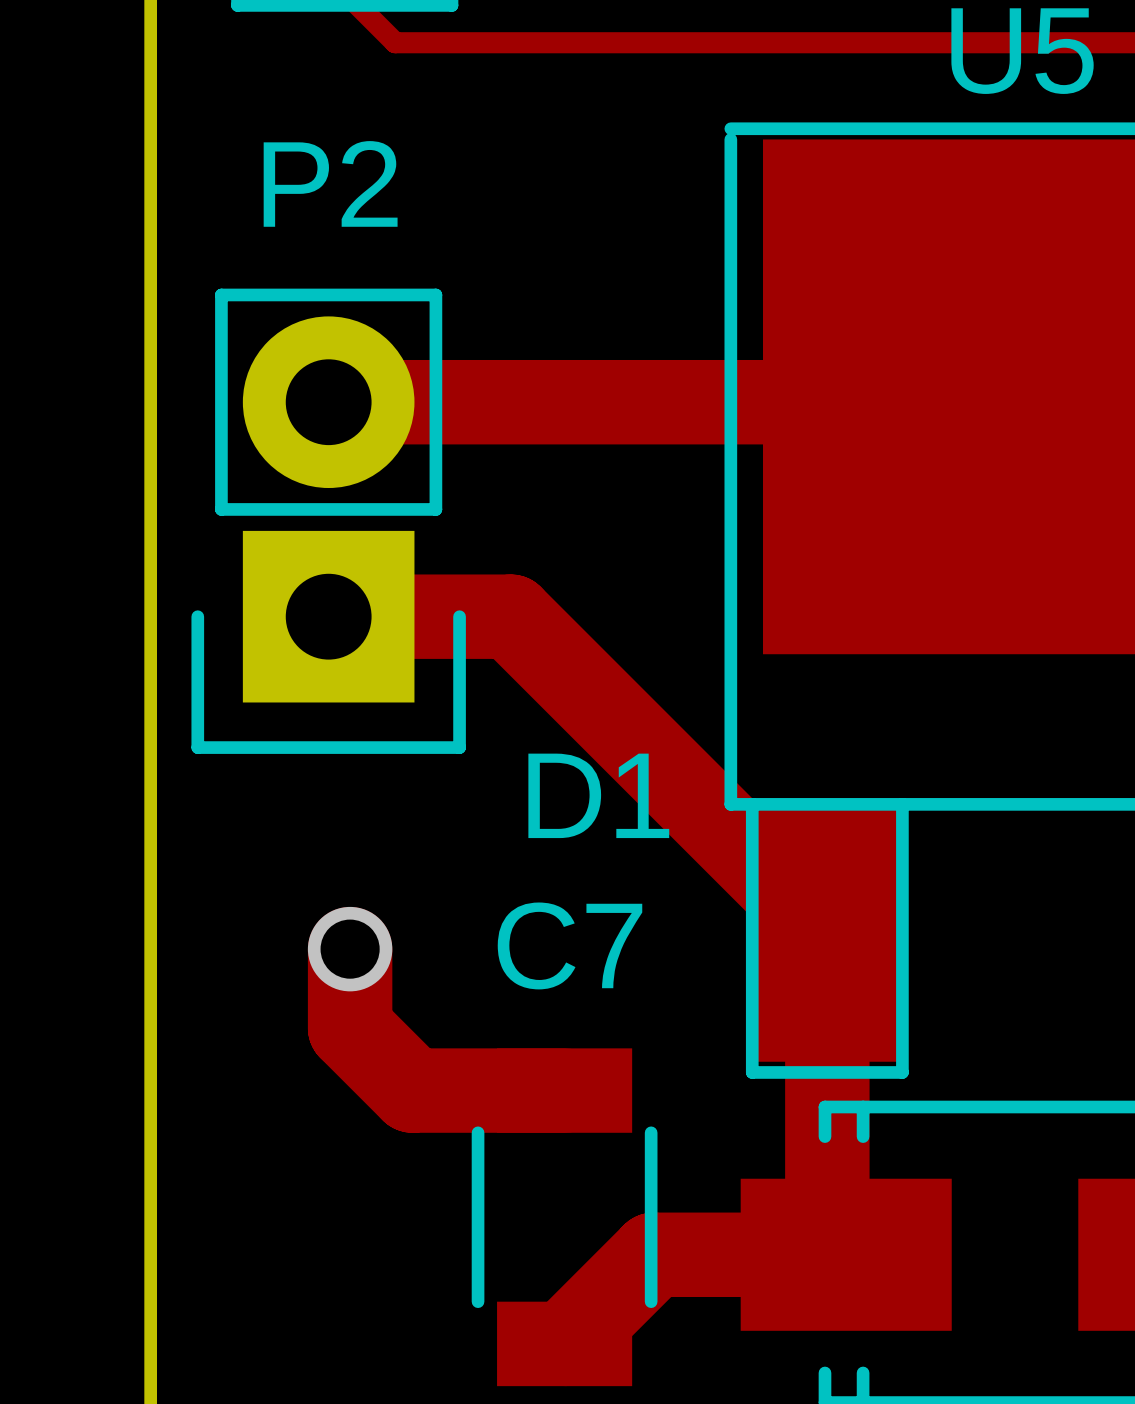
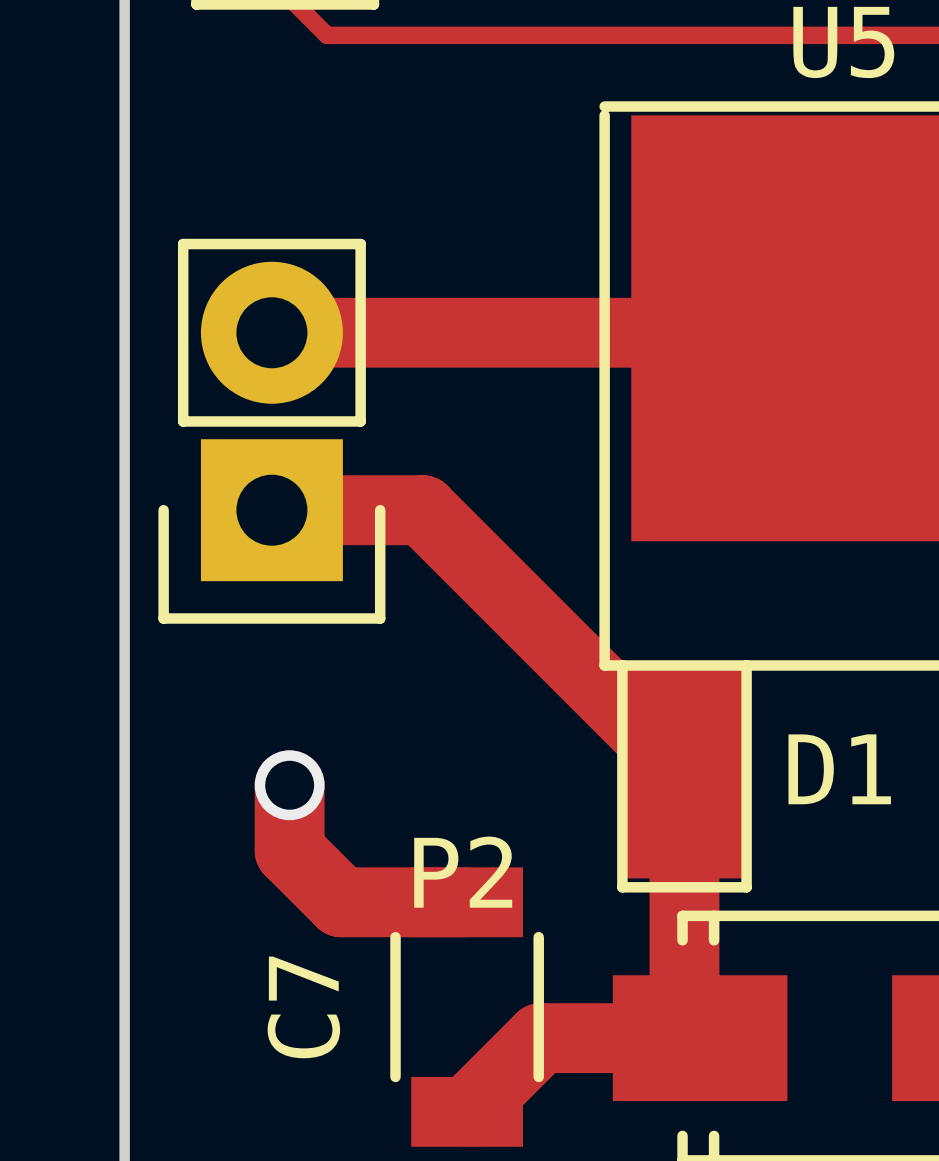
P2 name position: P2 (330, 183) -> P2 (463, 872)
D1 name position: D1 (598, 795) -> D1 (839, 769)
C7 name rotation: 0° (569, 945) -> 90° counterclockwise (303, 1007)
C7 name position: C7 (569, 945) -> C7 (303, 1007)

